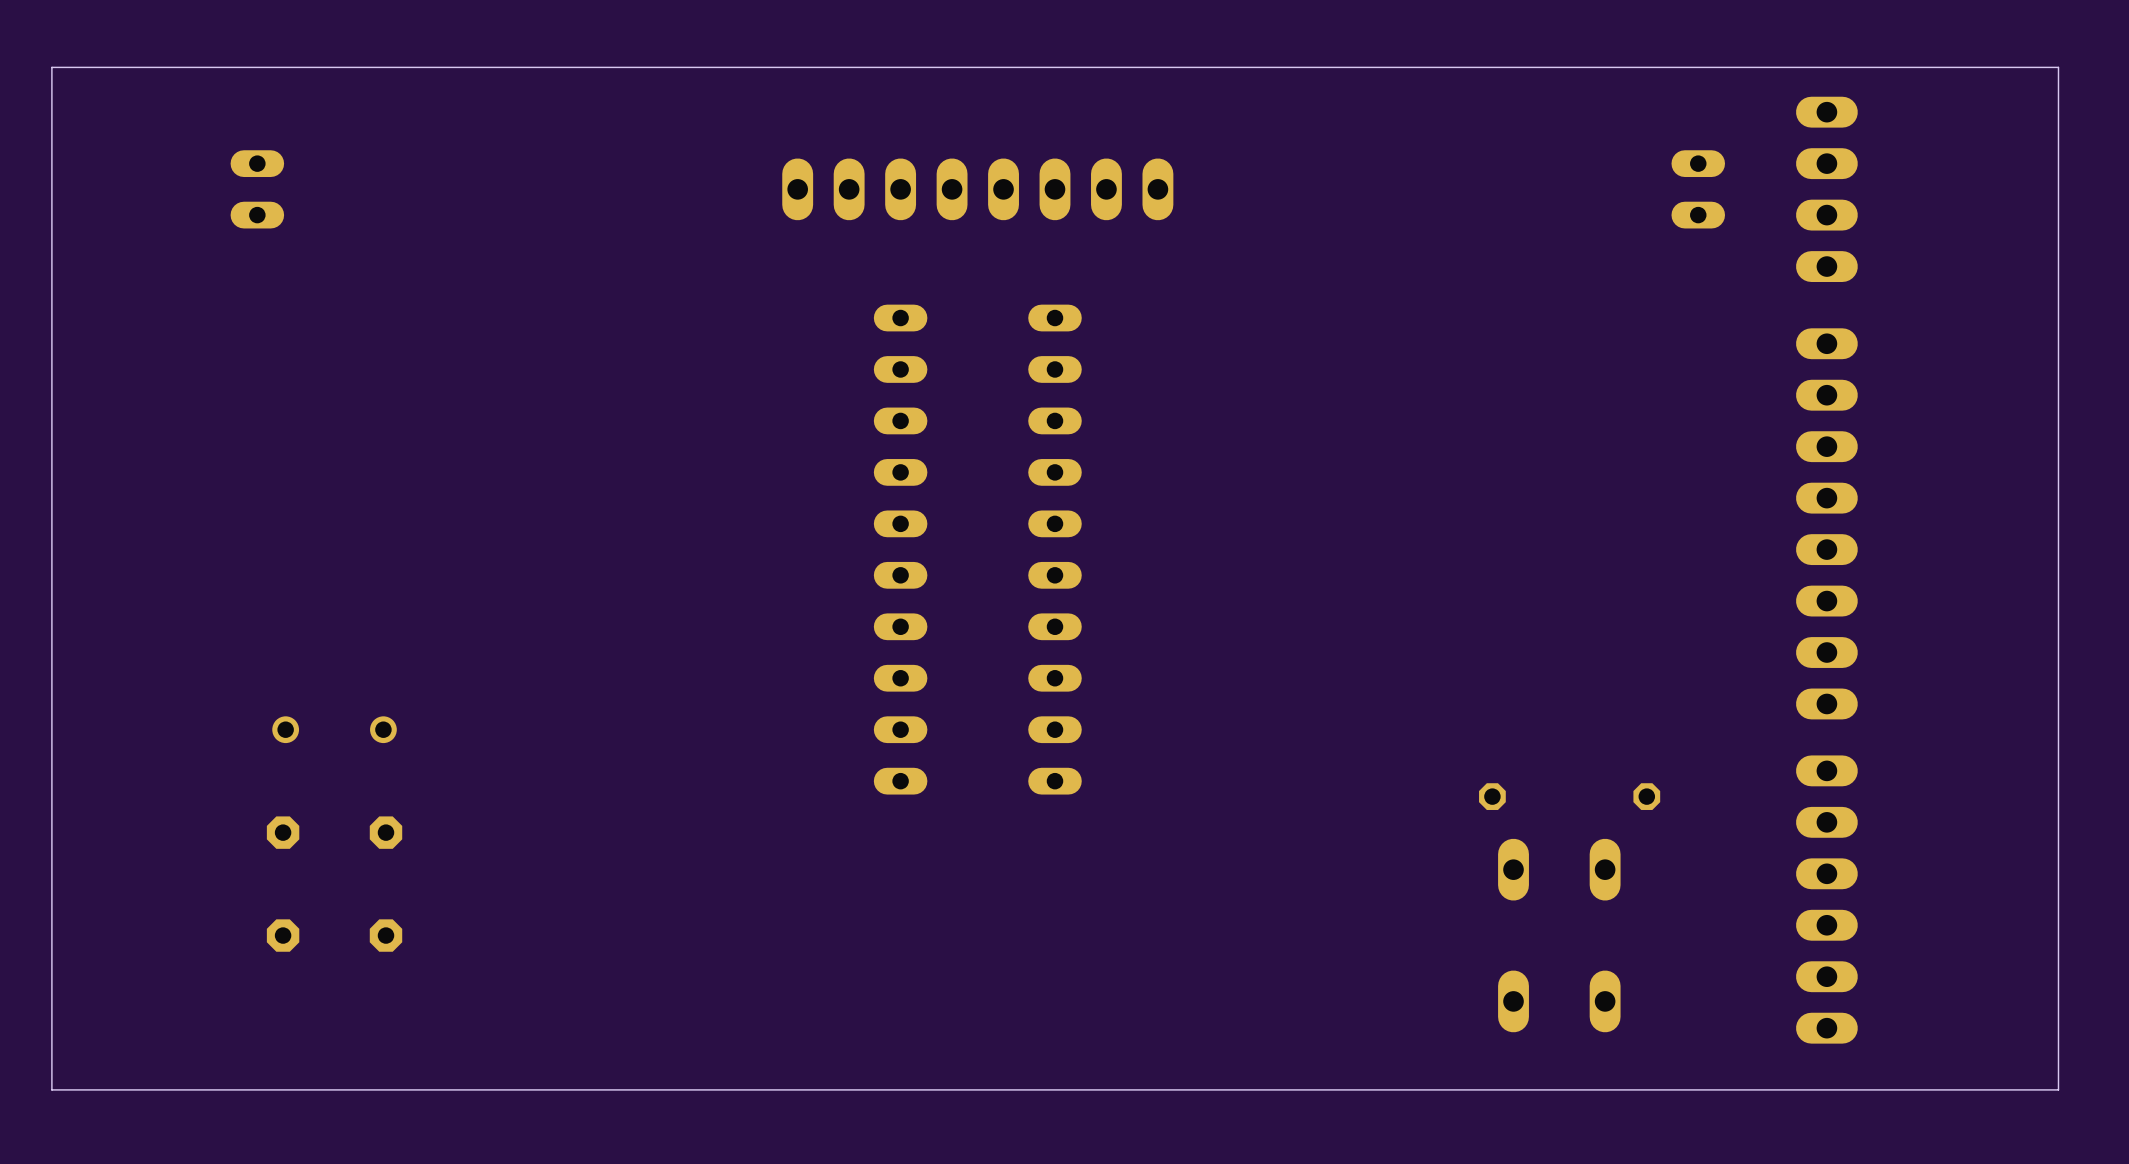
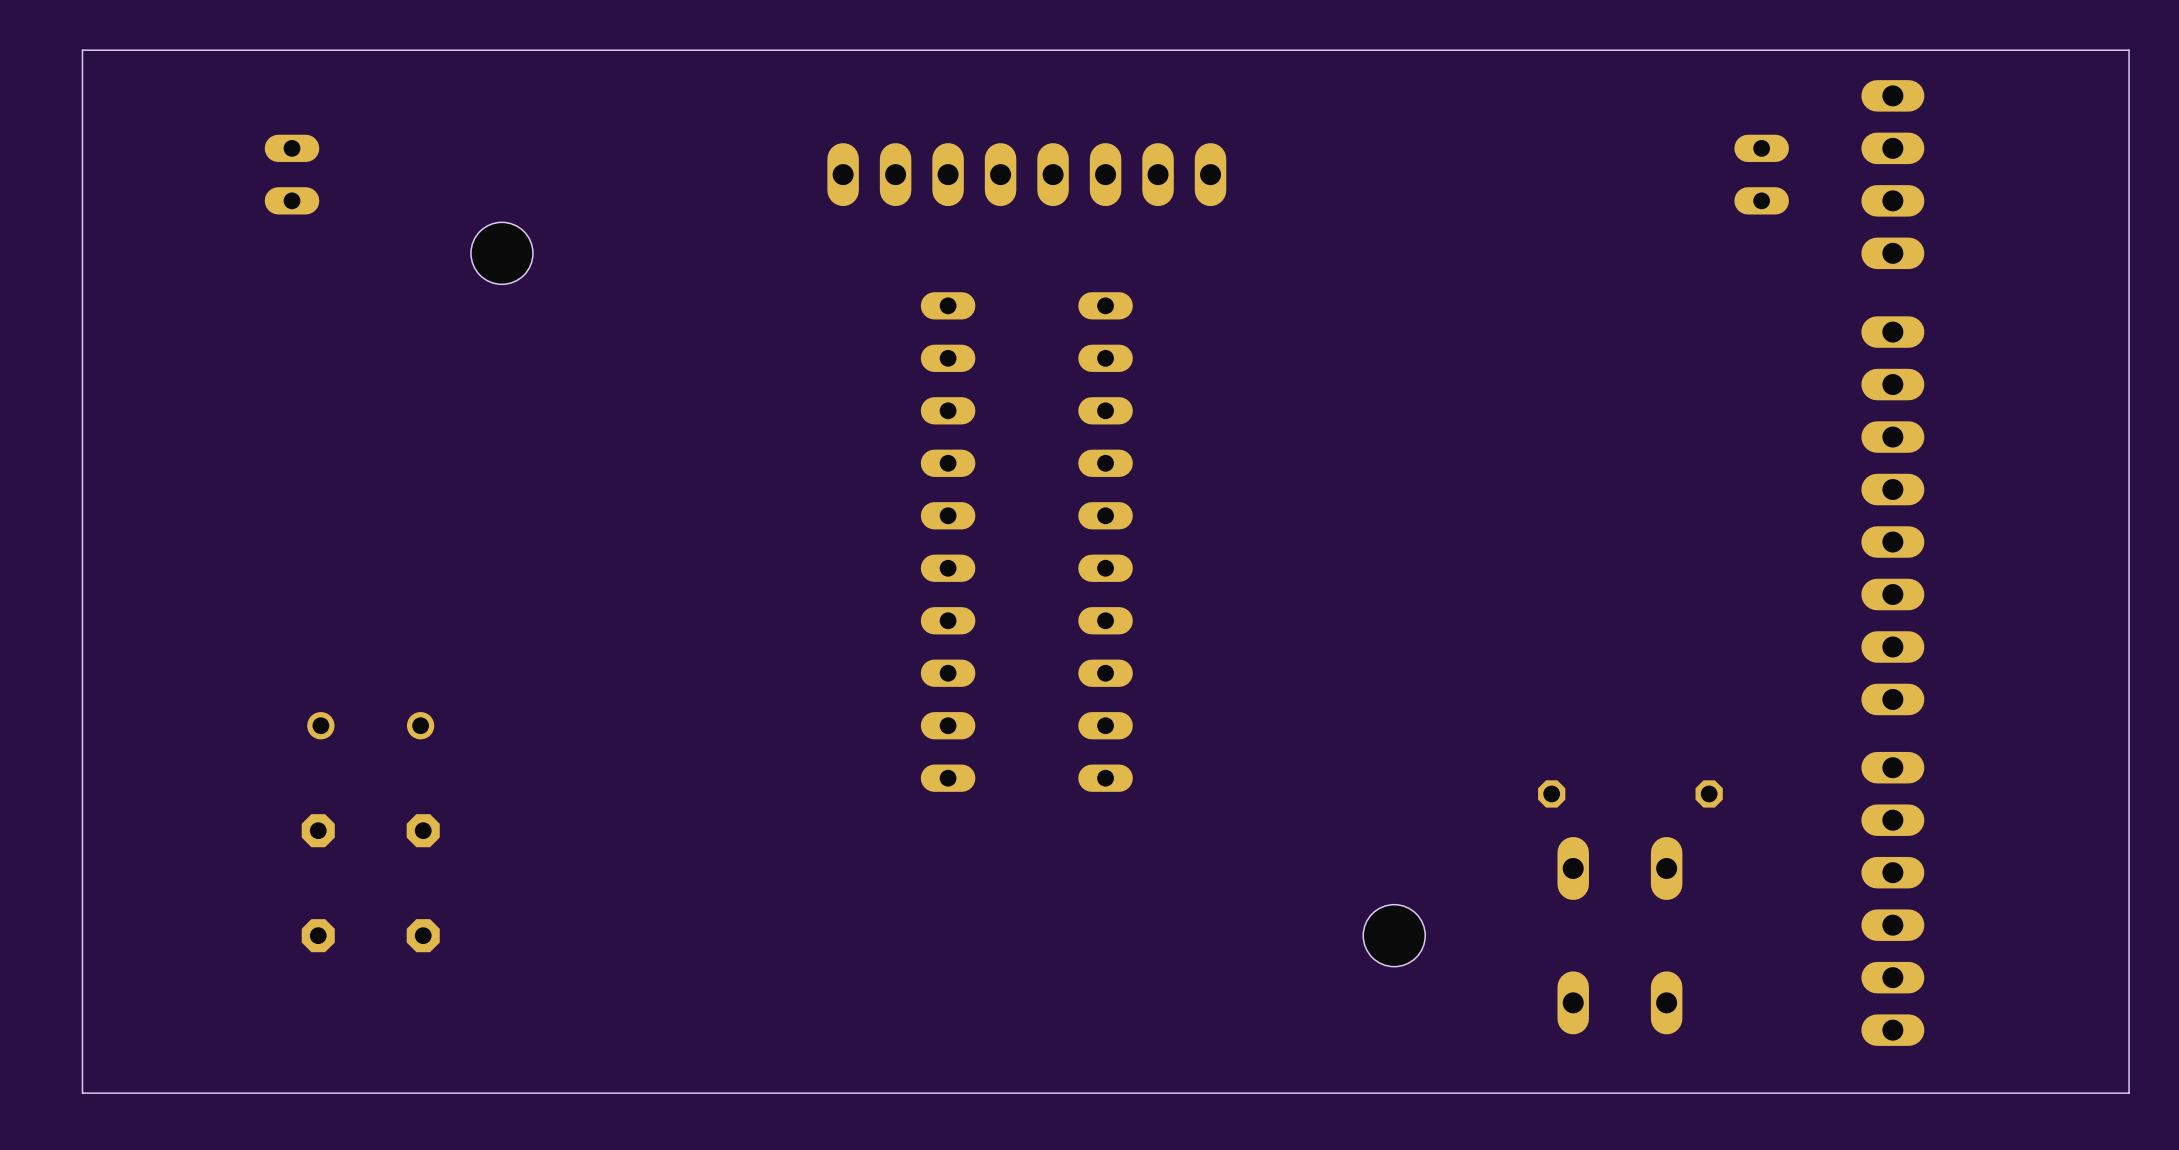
hole: none -> (501, 253)
hole: none -> (1394, 935)

